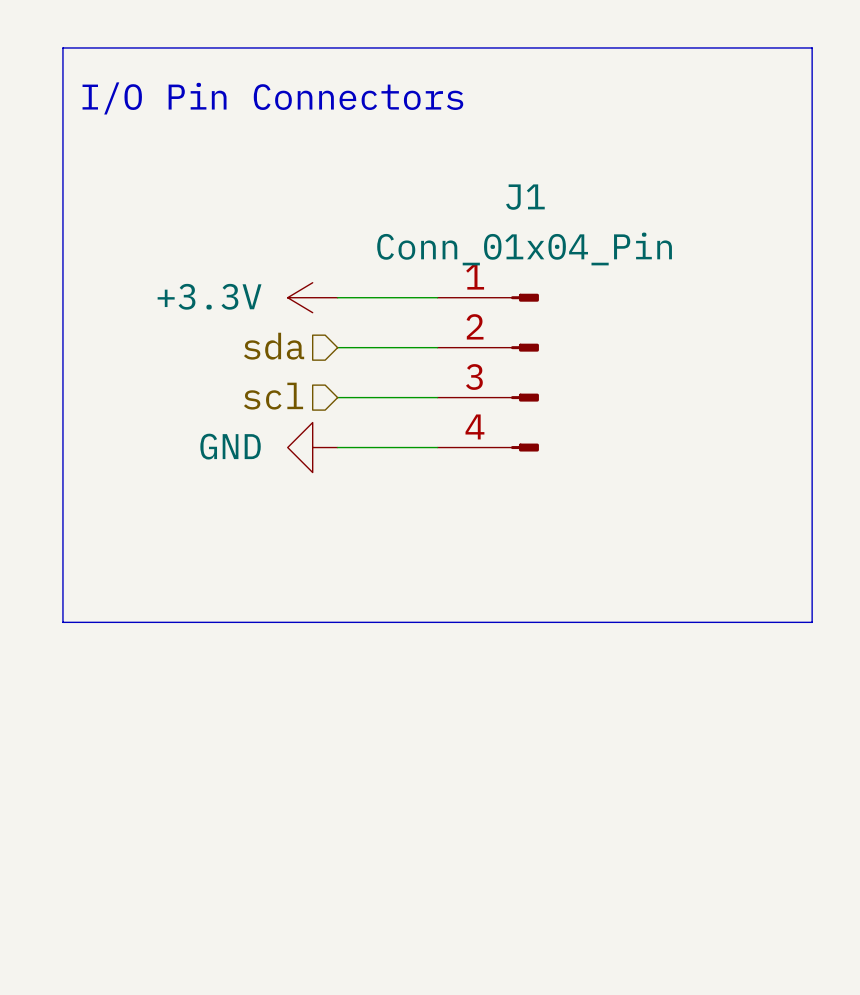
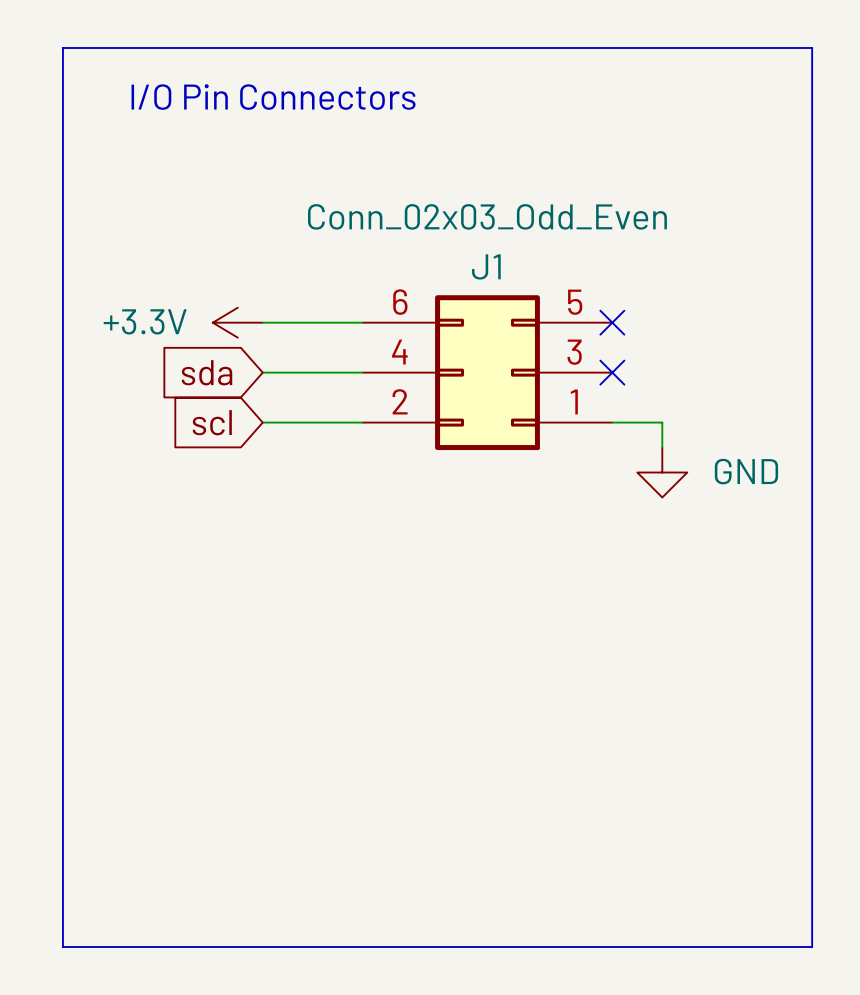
J1 name position: J1 (525, 197) -> J1 (486, 266)
J1 value: Conn_01x04_Pin (524, 248) -> Conn_02x03_Odd_Even (487, 216)
J1 symbol: [437, 293, 539, 452] -> [362, 295, 613, 451]
power symbol position: +3.3V (312, 297) -> +3.3V (237, 322)
wire: (337, 297) (437, 297) -> none
no-connect mark: none -> (612, 322)
hierarchical label: sda (274, 346) -> none
wire: (337, 347) (437, 347) -> (262, 322) (362, 322)
global label: none -> sda (207, 372)
no-connect mark: none -> (612, 372)
hierarchical label: scl (273, 396) -> none
wire: (337, 397) (437, 397) -> (262, 372) (362, 372)
global label: none -> scl (212, 422)
wire: none -> (612, 422) (662, 422) (662, 447)
power symbol text position: GND (230, 446) -> GND (746, 471)
power symbol rotation: 0° (312, 447) -> 90° counterclockwise (662, 472)
power symbol position: GND (312, 447) -> GND (662, 472)
wire: (337, 447) (437, 447) -> (262, 422) (362, 422)
line: (62, 622) (812, 622) -> (62, 622) (62, 946) (812, 946) (812, 622)

